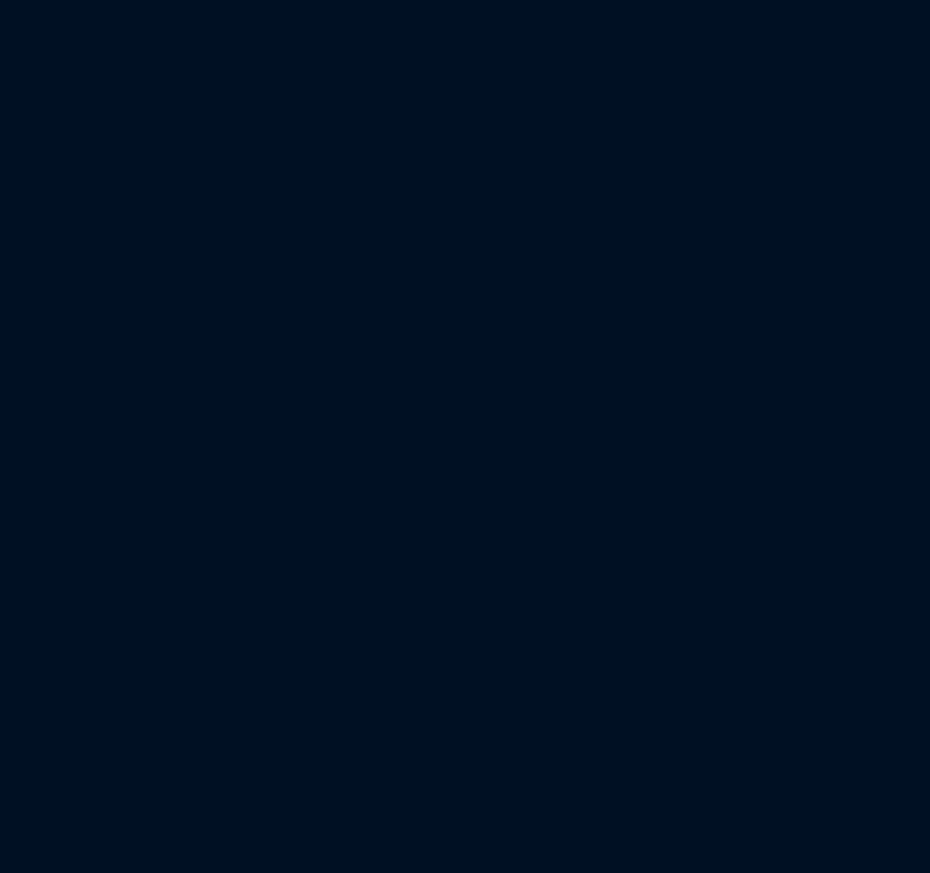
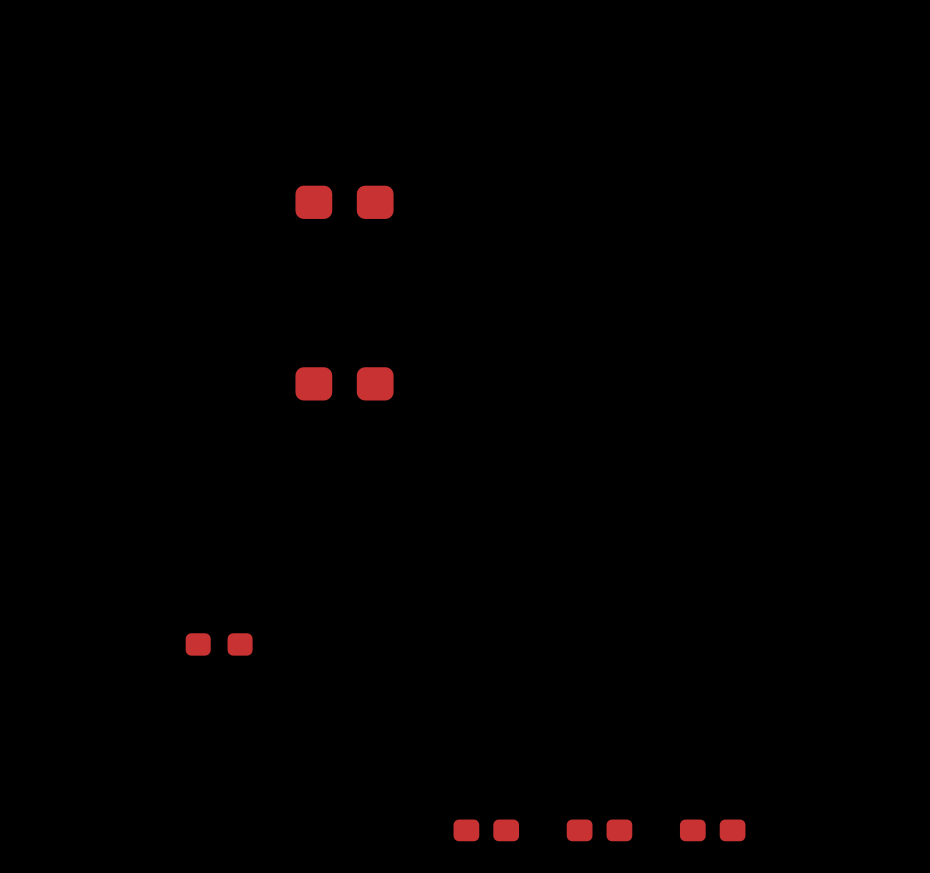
part: none -> (344, 202)
part: none -> (344, 383)
part: none -> (219, 644)
part: none -> (486, 830)
part: none -> (599, 830)
part: none -> (712, 830)

